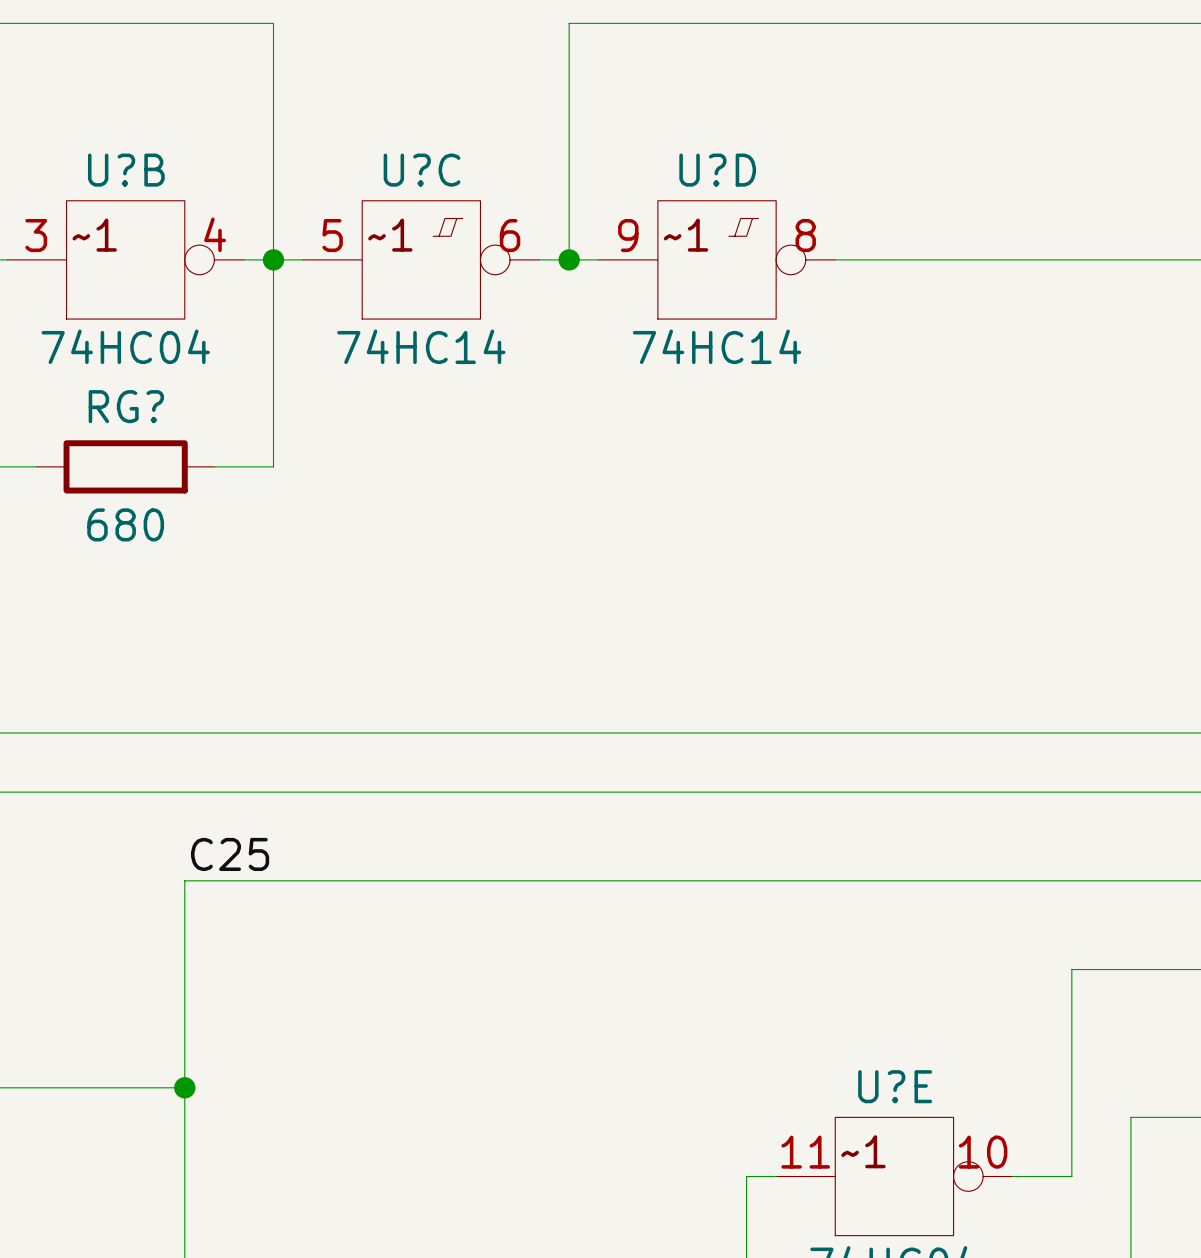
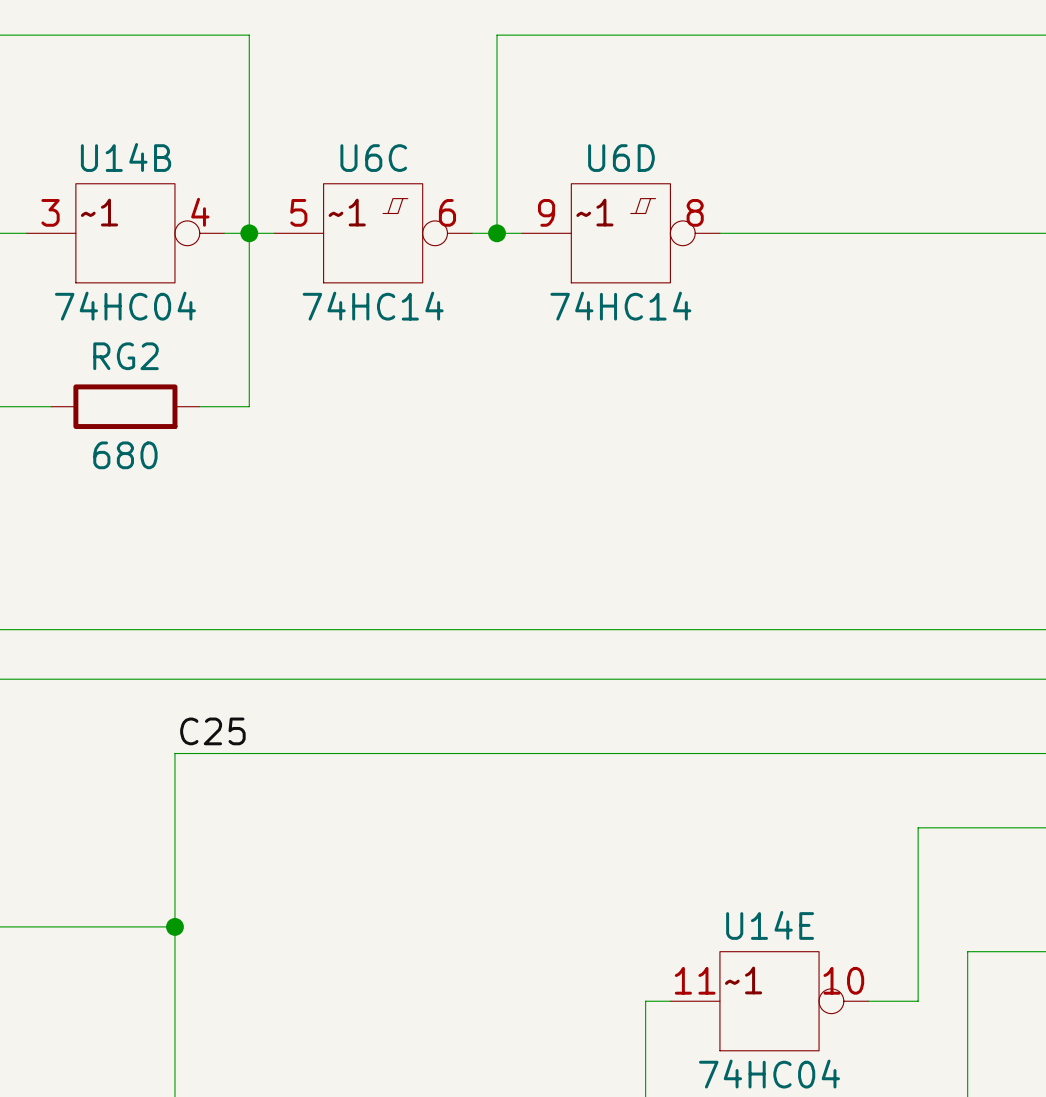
U?B name: U?B (126, 170) -> U14B (126, 157)
U?C name: U?C (422, 170) -> U6C (373, 158)
U?D name: U?D (717, 170) -> U6D (621, 158)
RG? name: RG? (126, 406) -> RG2 (126, 356)
U?E name: U?E (895, 1086) -> U14E (770, 925)

